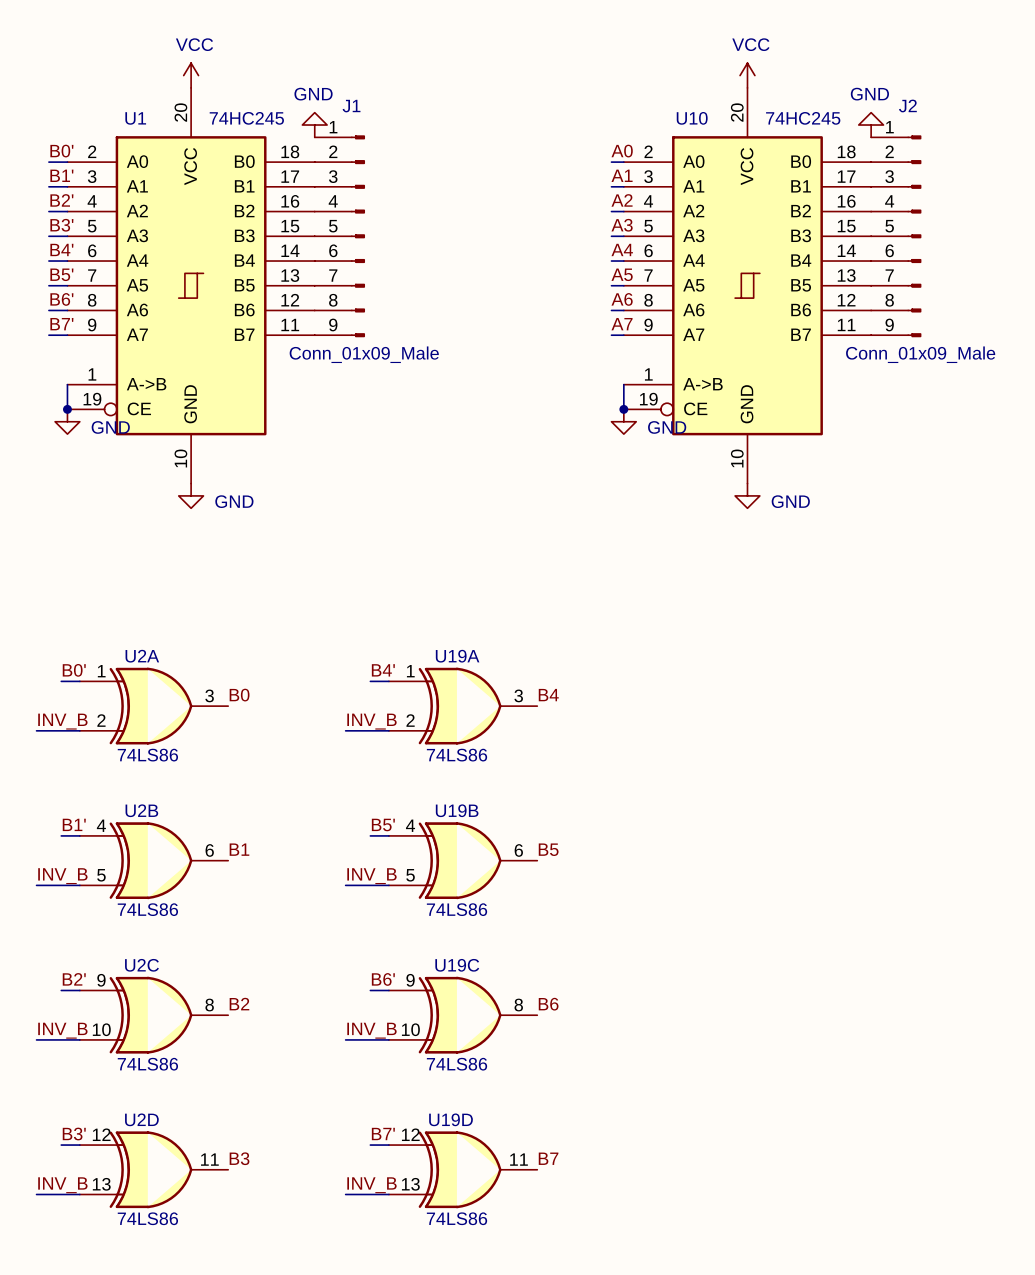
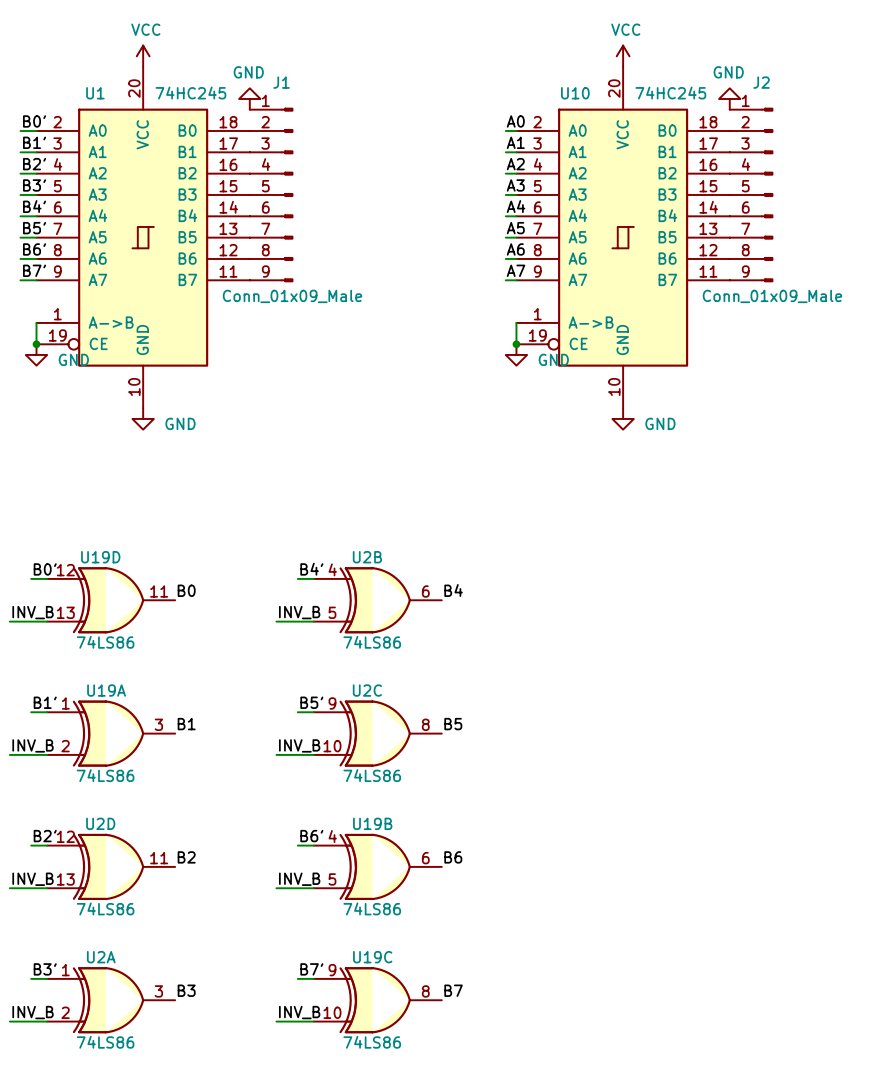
U2A position: (154, 706) -> (111, 1000)
U19A position: (463, 706) -> (111, 733)
U2B position: (154, 860) -> (377, 600)
U19B position: (463, 860) -> (377, 866)
U2C position: (154, 1015) -> (377, 733)
U19C position: (463, 1015) -> (377, 1000)
U2D position: (154, 1169) -> (111, 866)
U19D position: (463, 1169) -> (111, 600)

